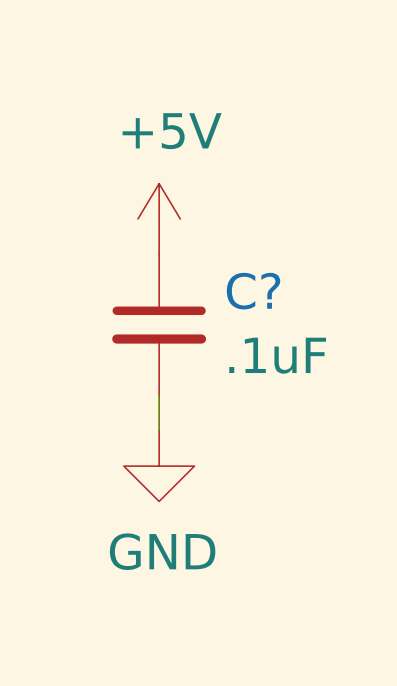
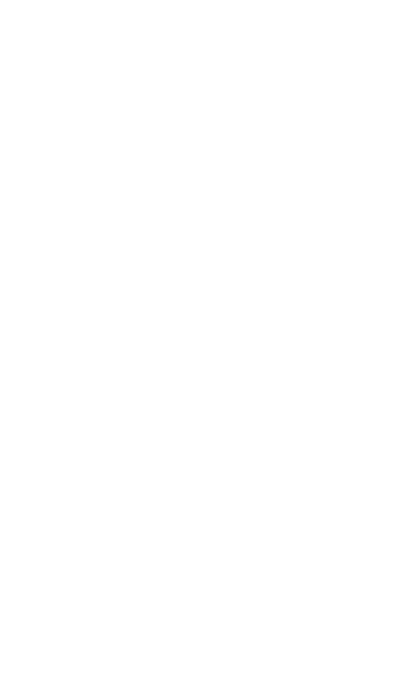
power symbol: +5V (159, 218) -> none
C?: .1uF (159, 324) -> none
wire: (159, 395) (159, 430) -> none
power symbol: GND (159, 466) -> none

